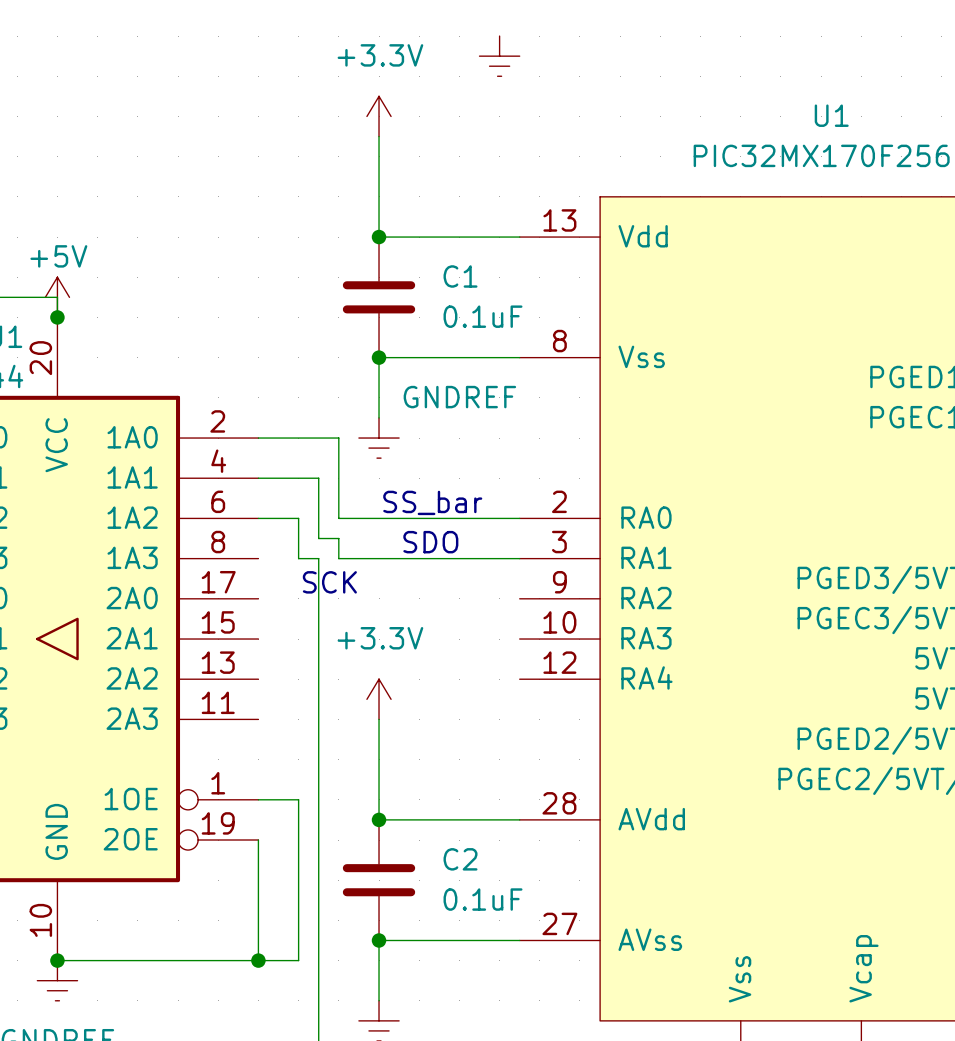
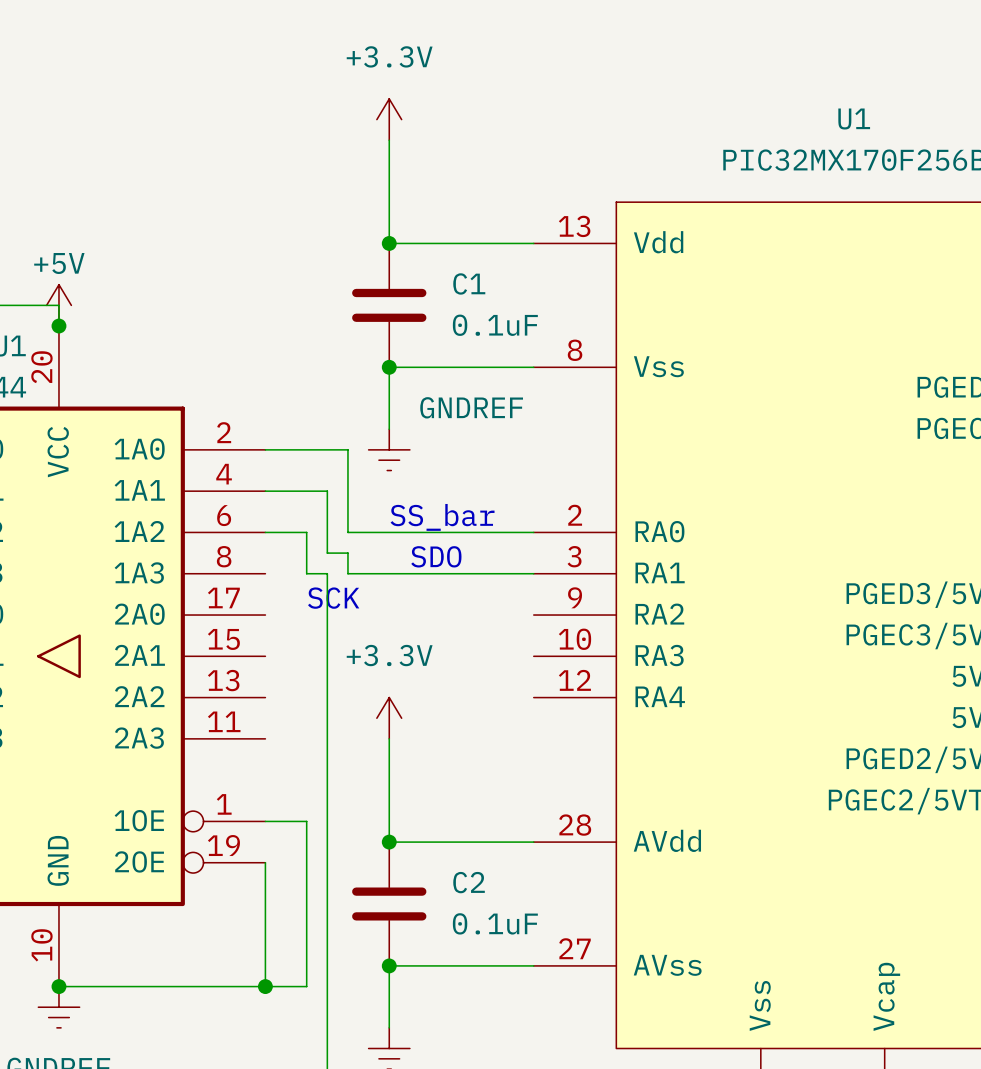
power symbol: (499, 56) -> none

